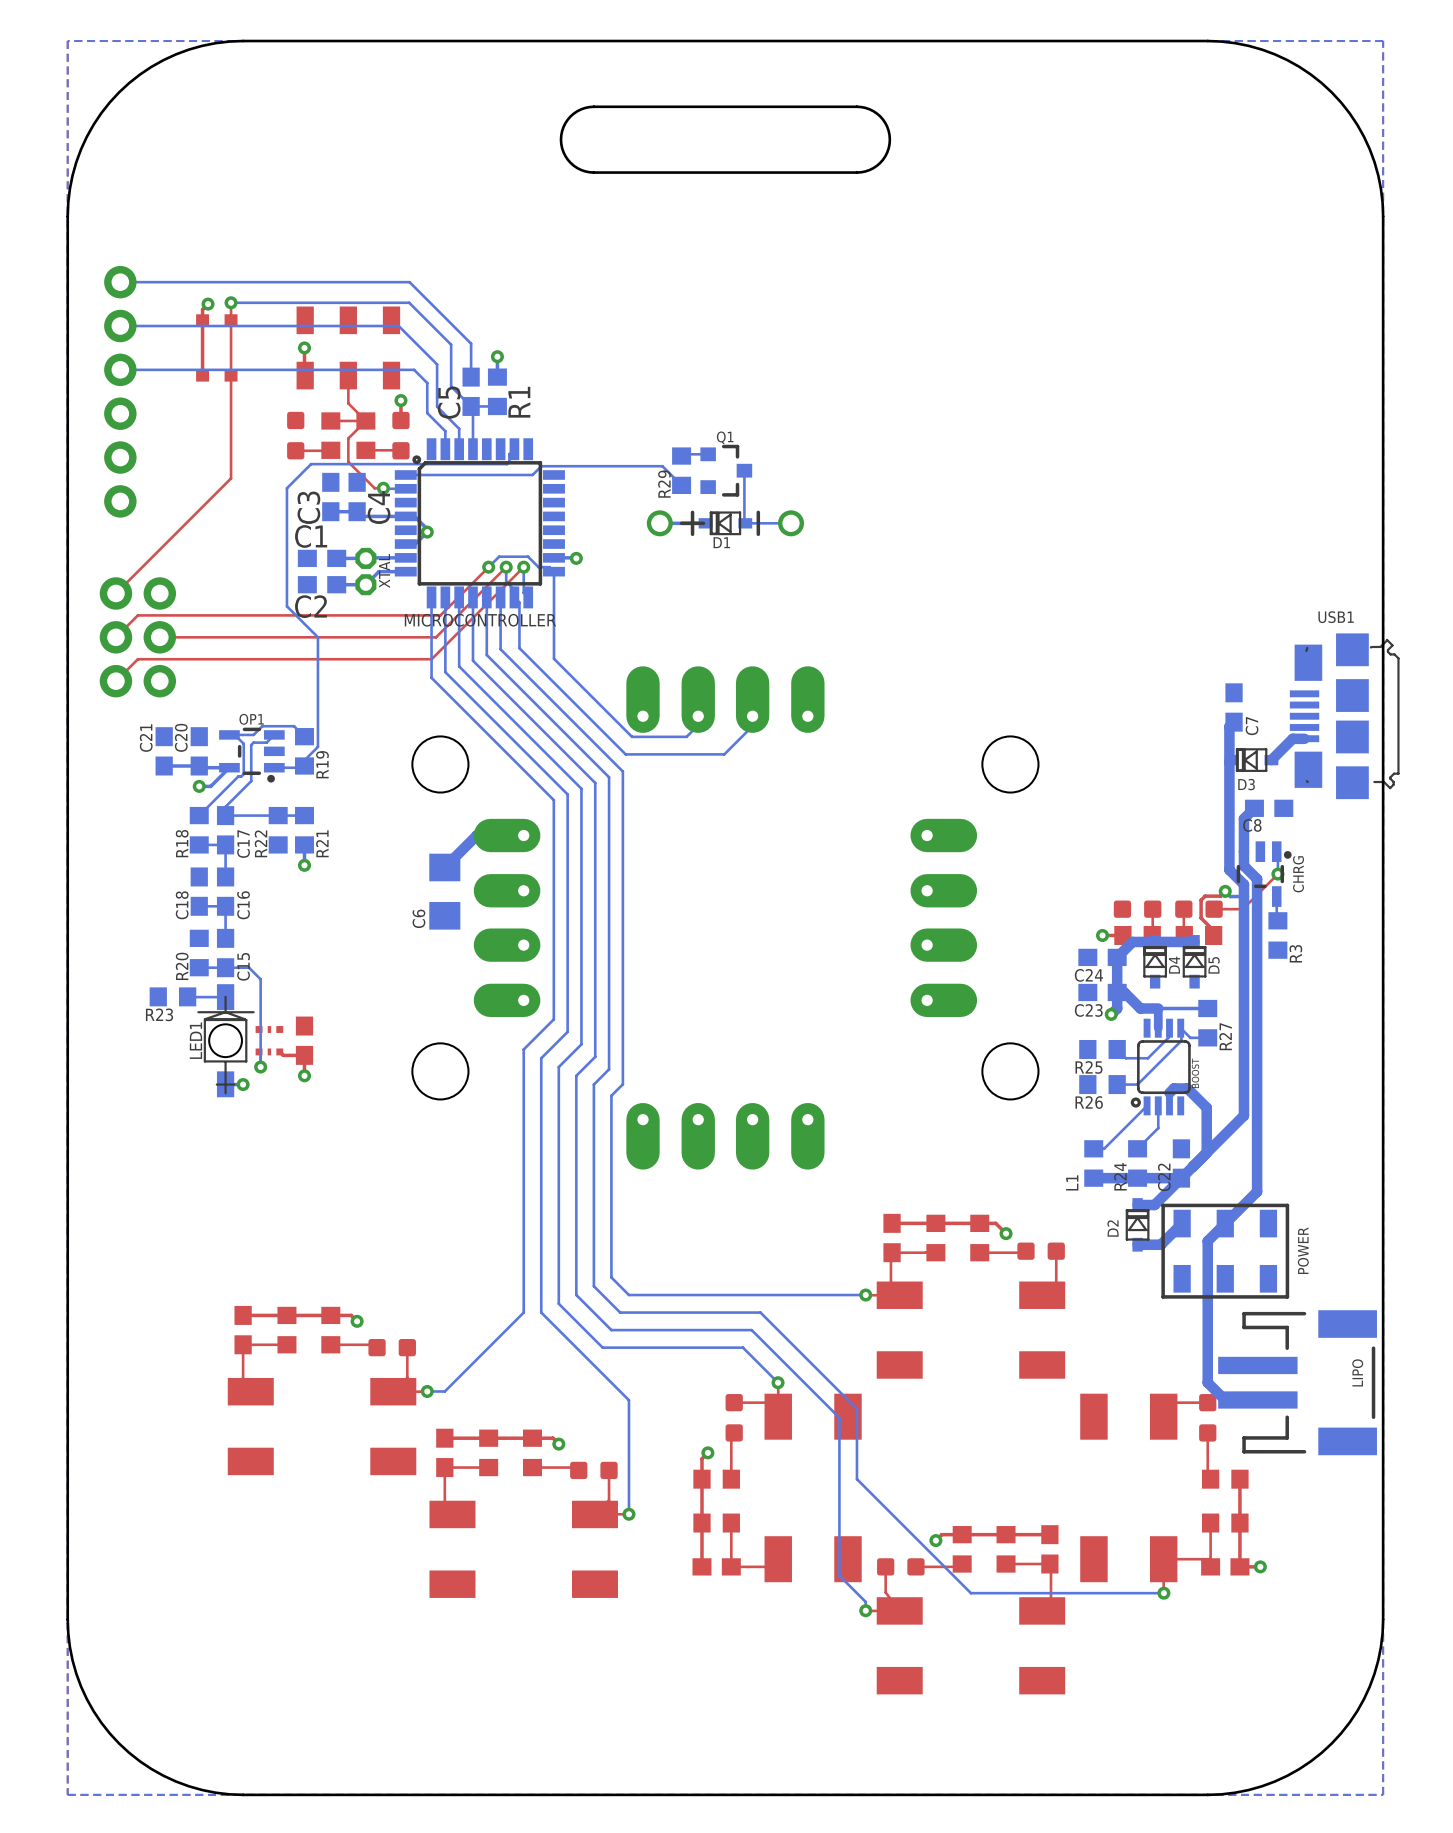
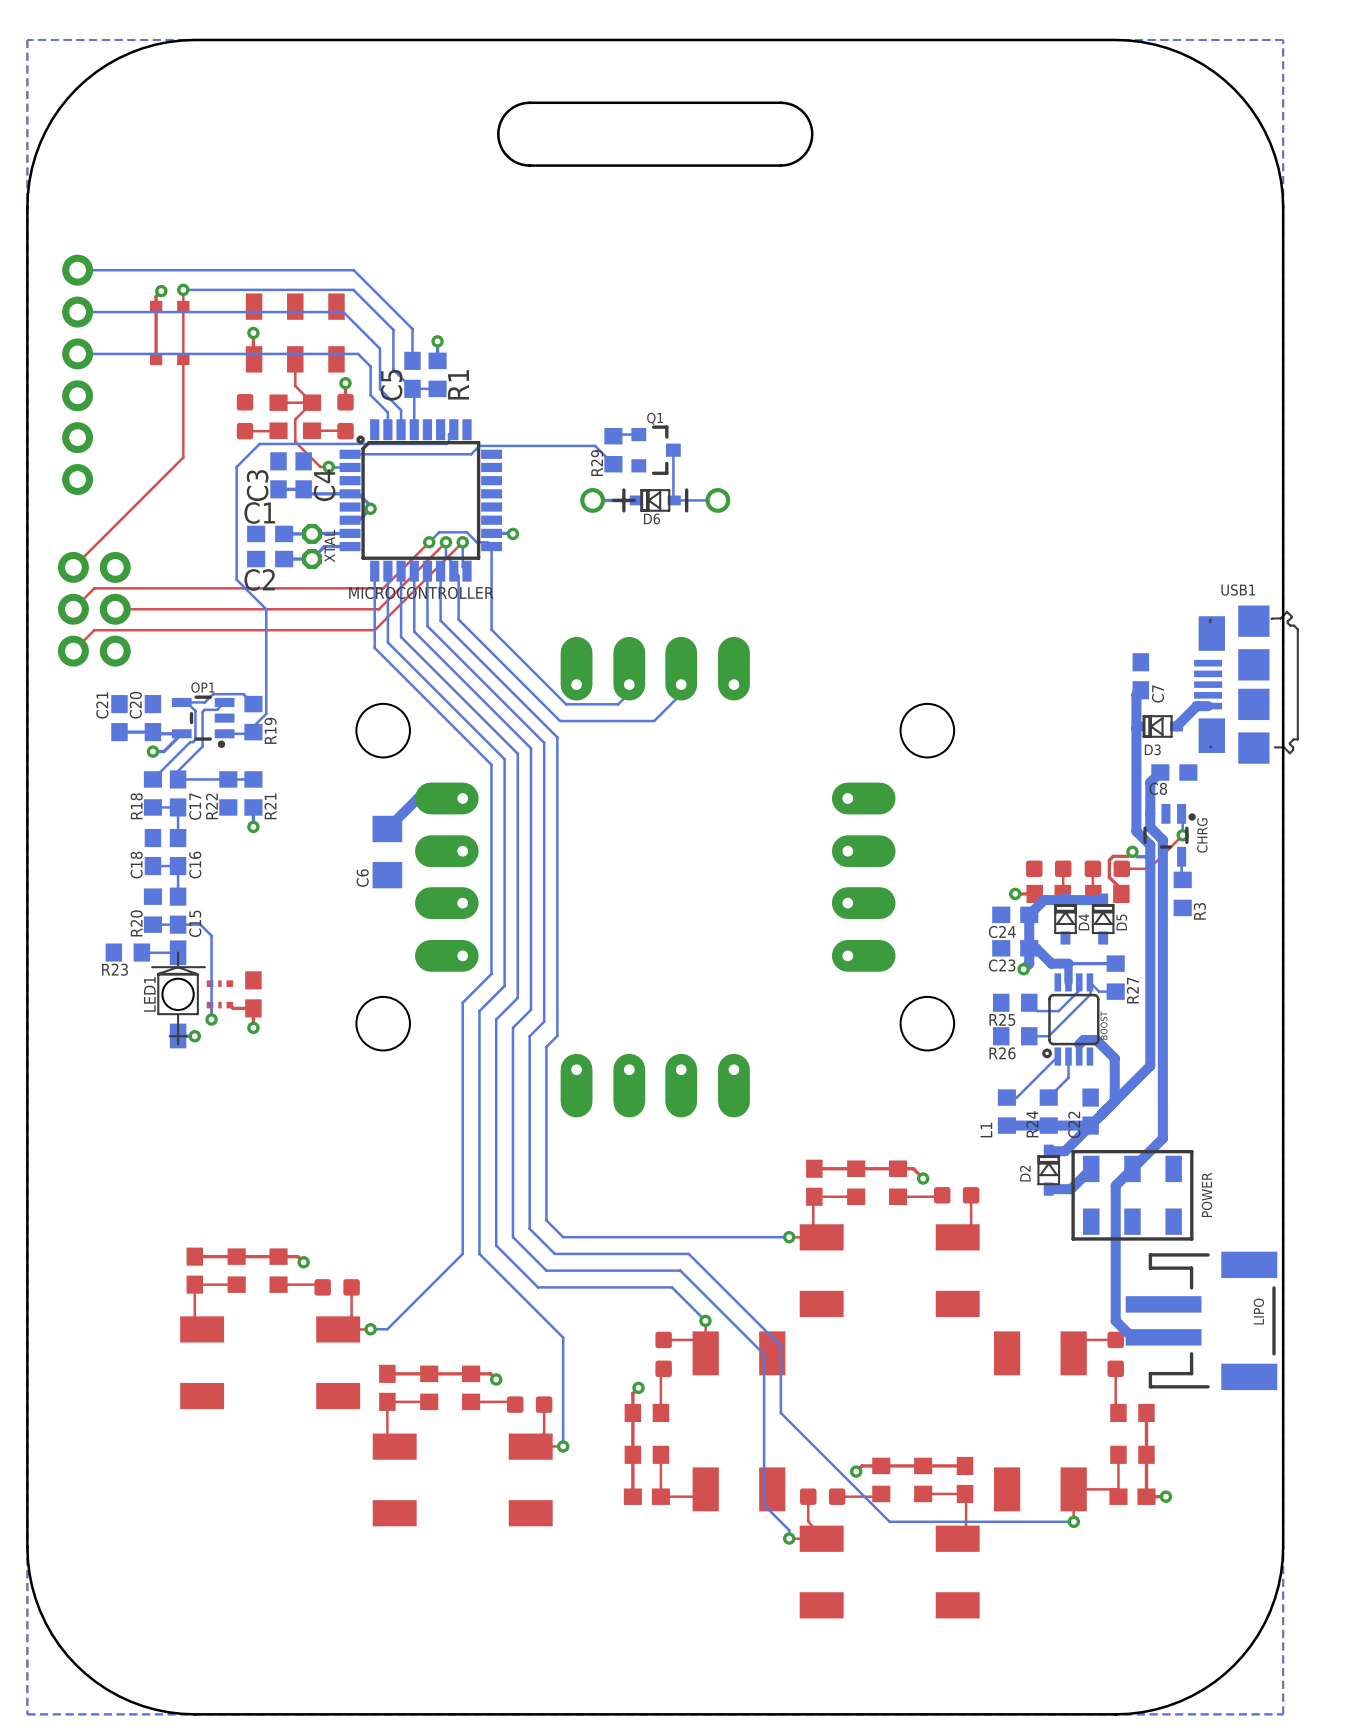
D1 name: D1 (721, 542) -> D6 (652, 518)

